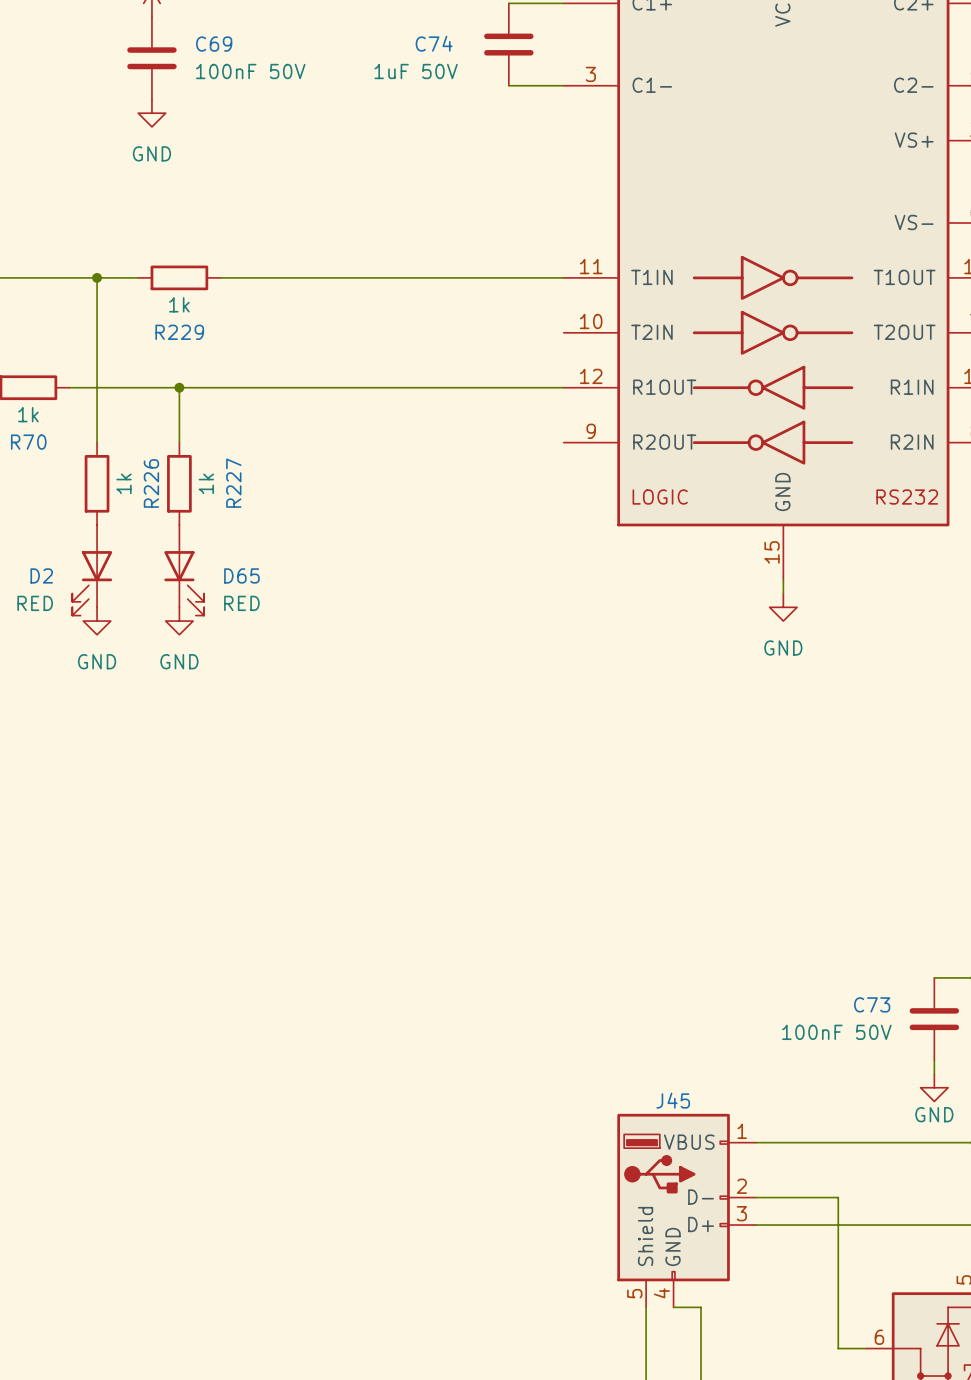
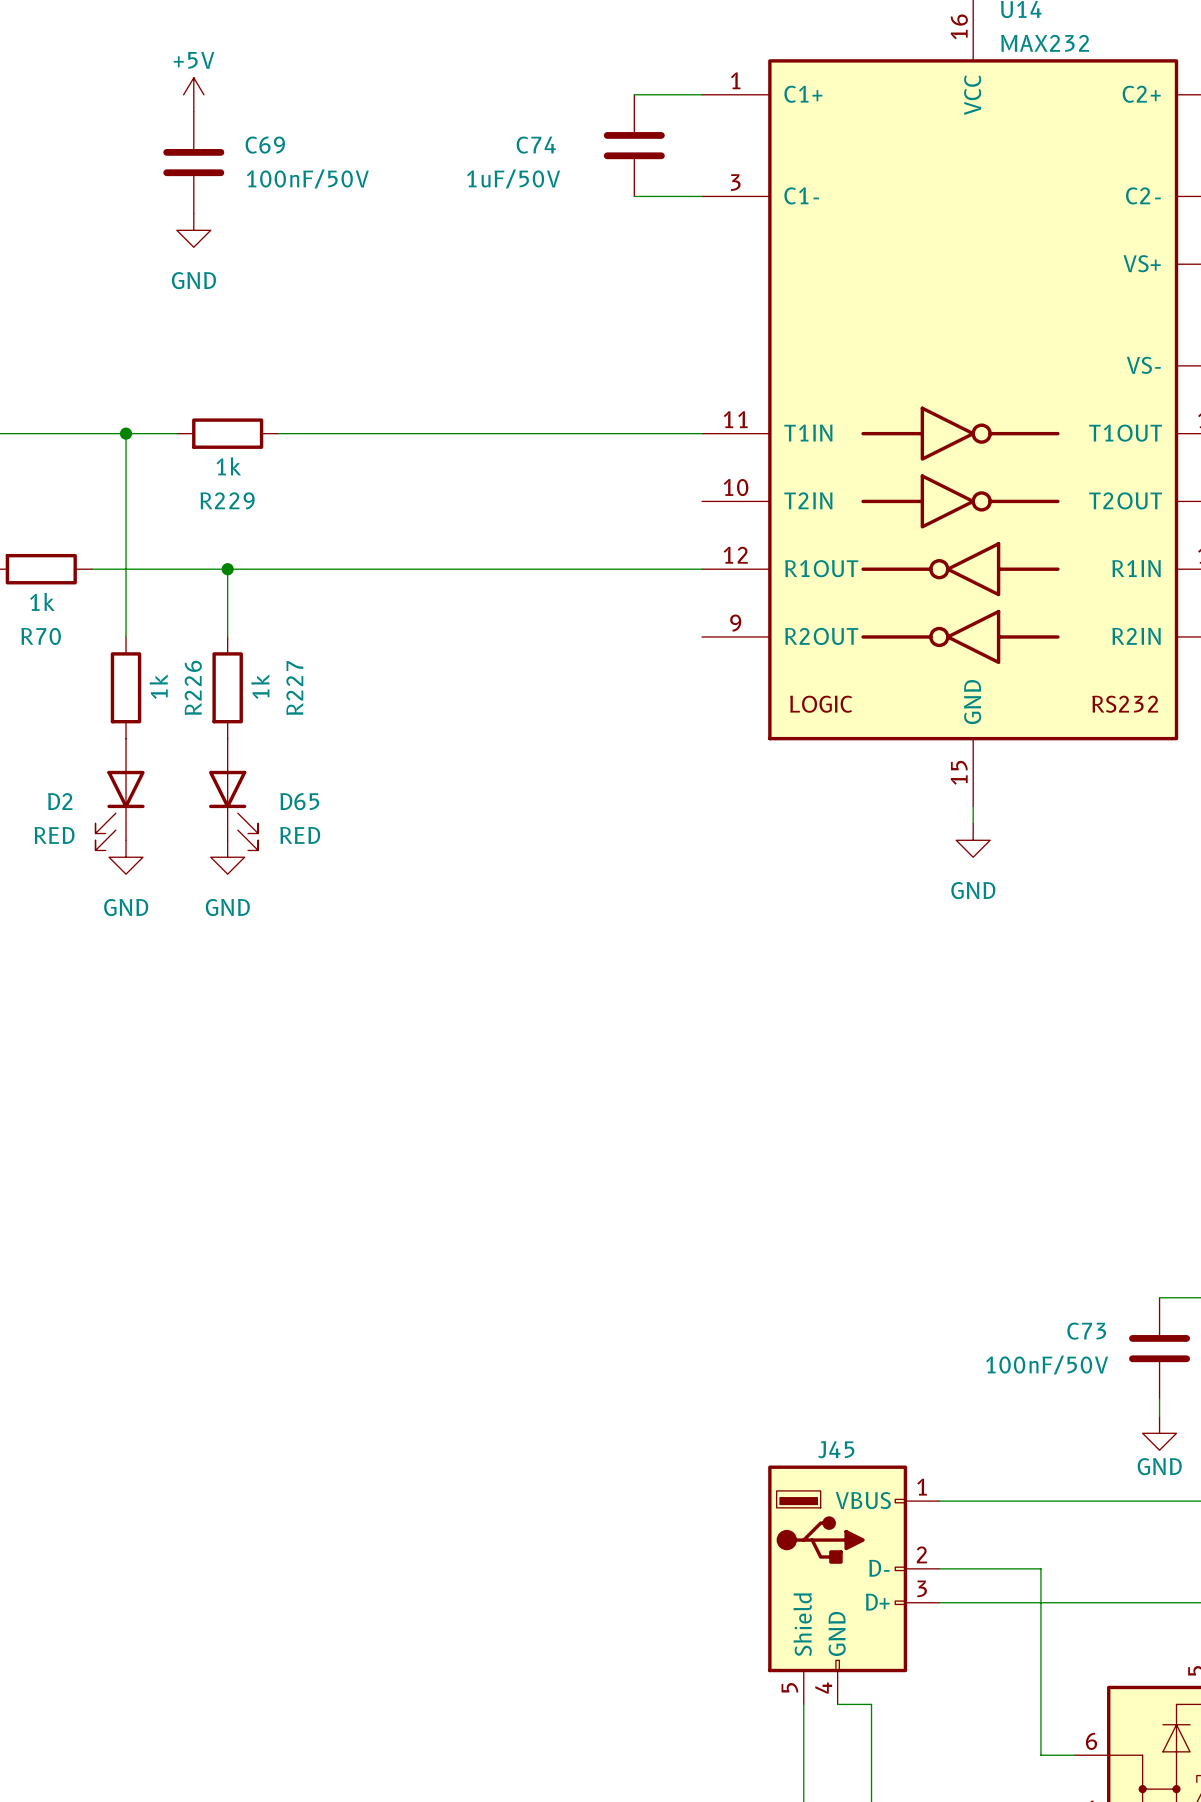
C69 value: 100nF 50V (250, 71) -> 100nF/50V (307, 178)
C74 value: 1uF 50V (416, 71) -> 1uF/50V (513, 178)
C73 value: 100nF 50V (836, 1032) -> 100nF/50V (1047, 1365)

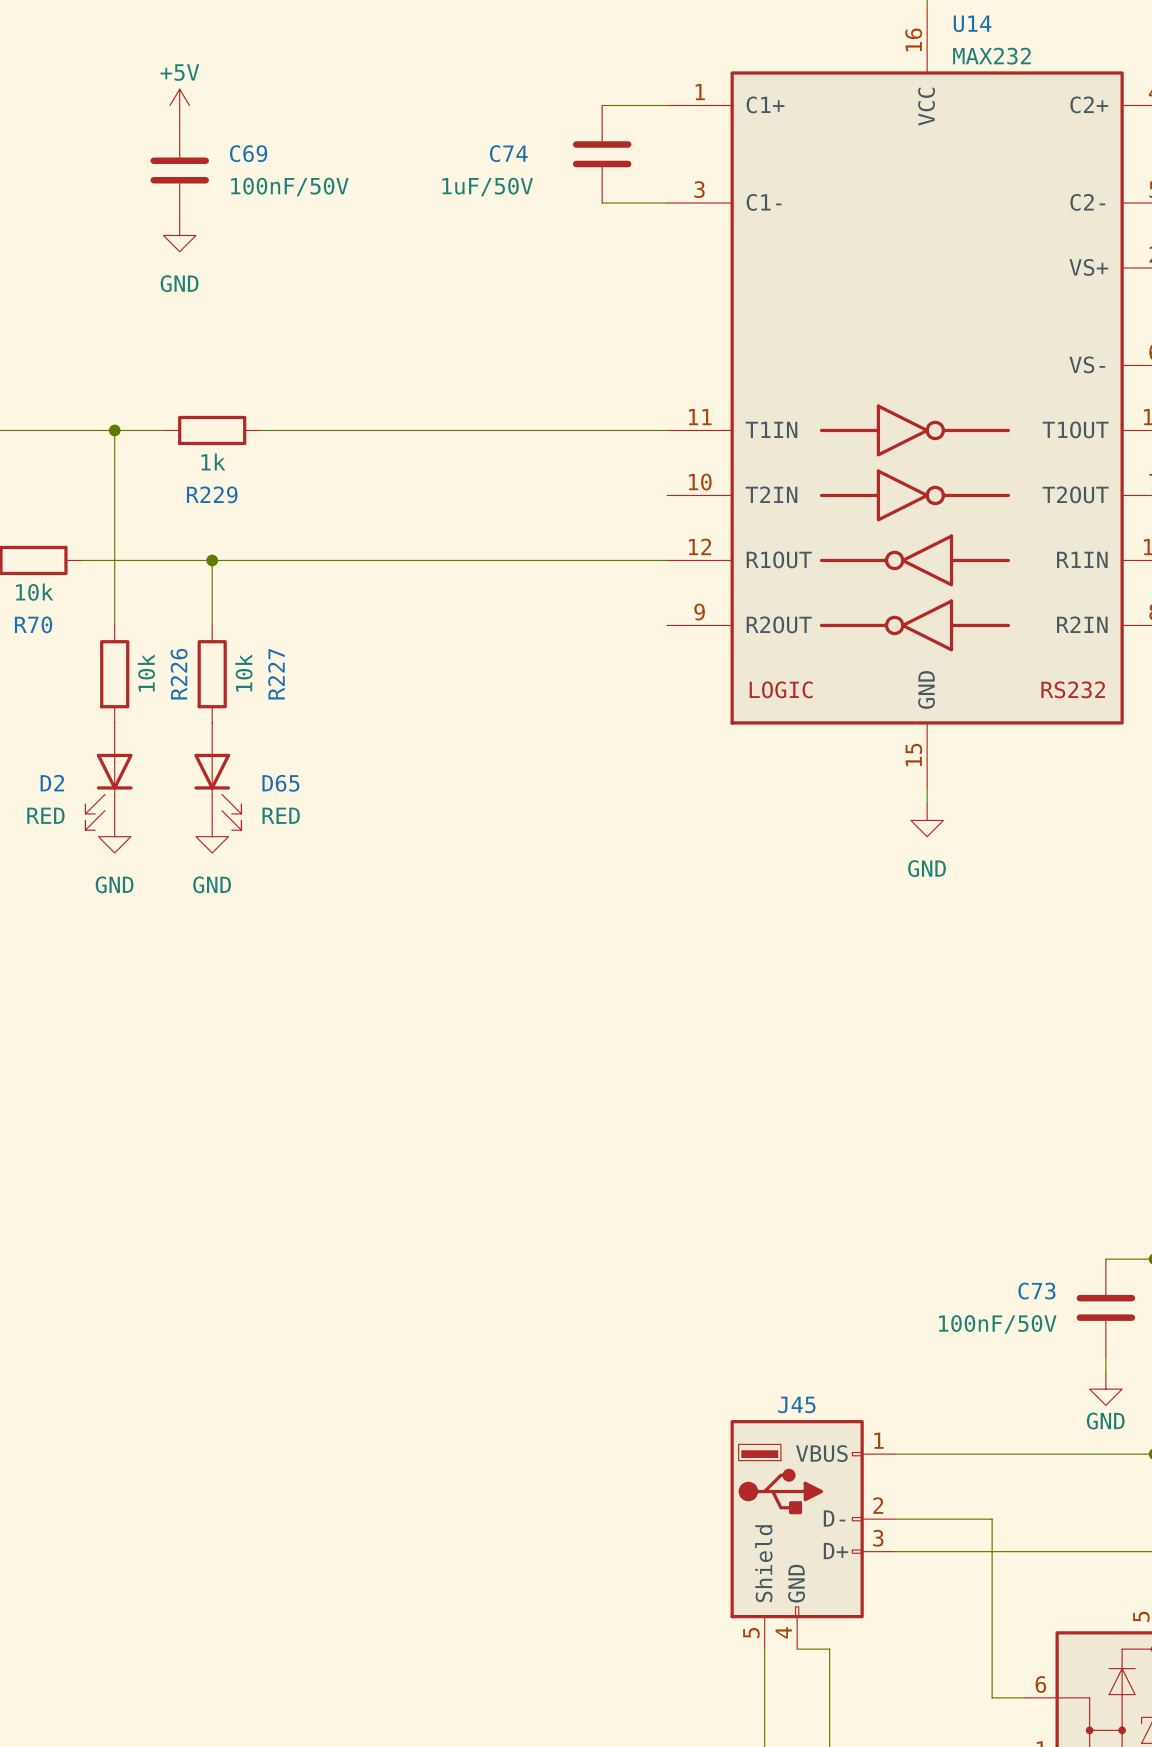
R70 value: 1k (42, 601) -> 10k (34, 592)
R226 value: 1k (158, 686) -> 10k (146, 673)
R227 value: 1k (260, 686) -> 10k (243, 673)

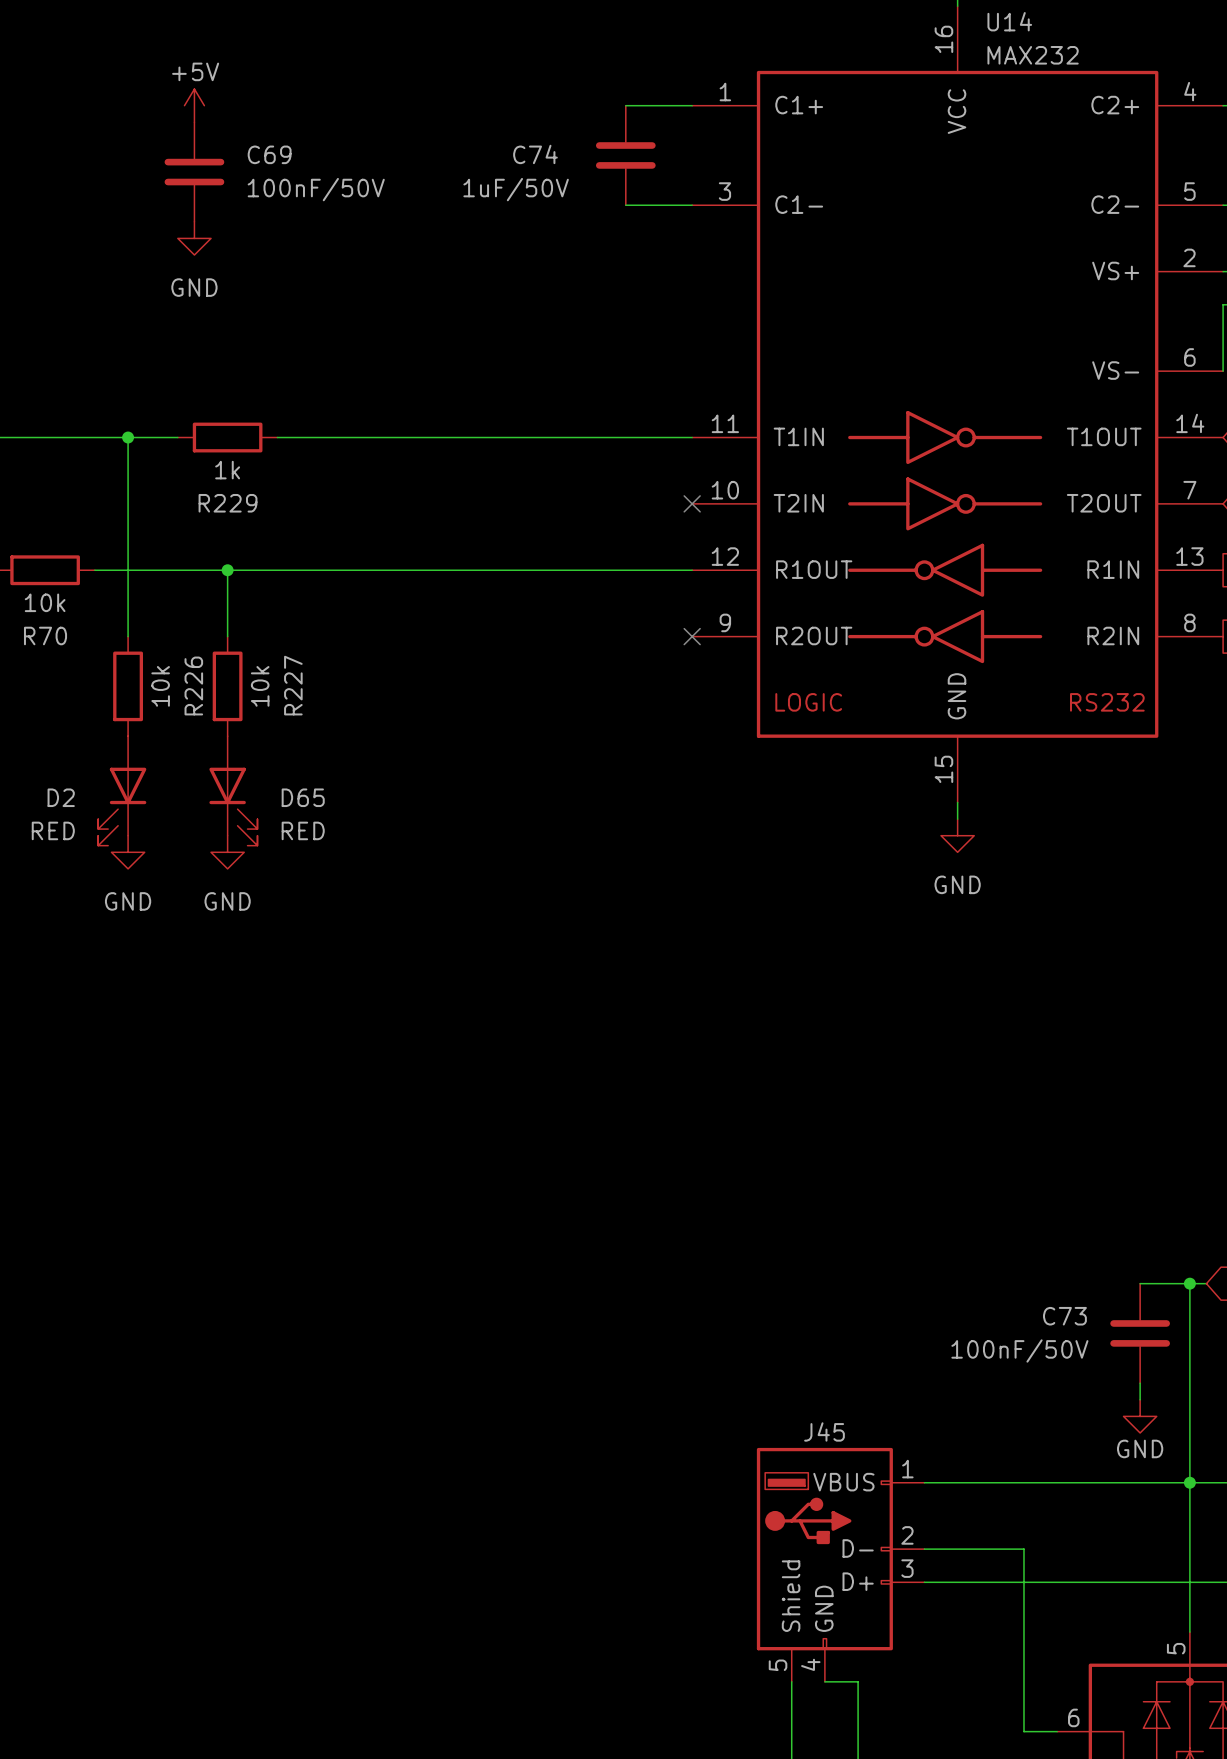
no-connect mark: none -> (692, 503)
no-connect mark: none -> (692, 636)

